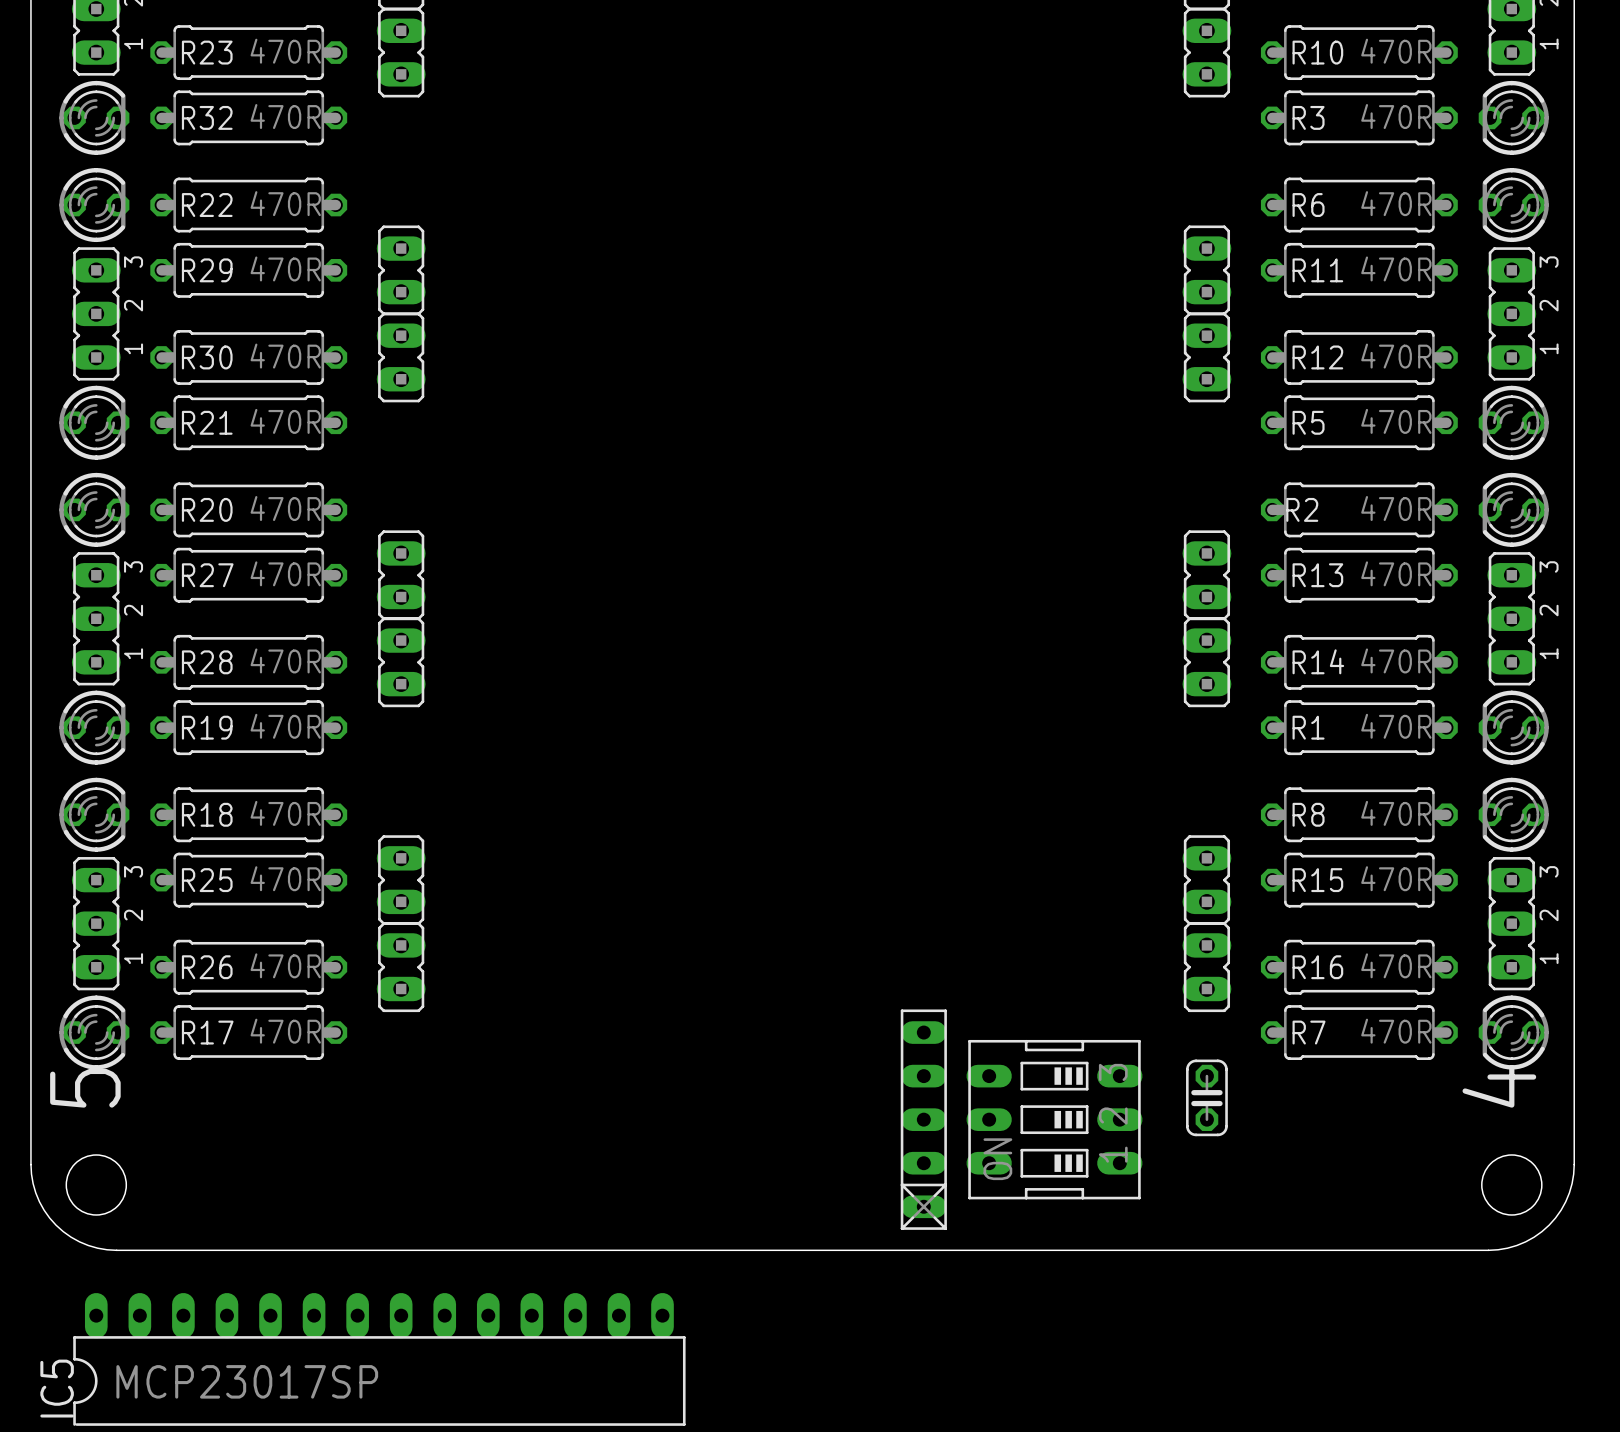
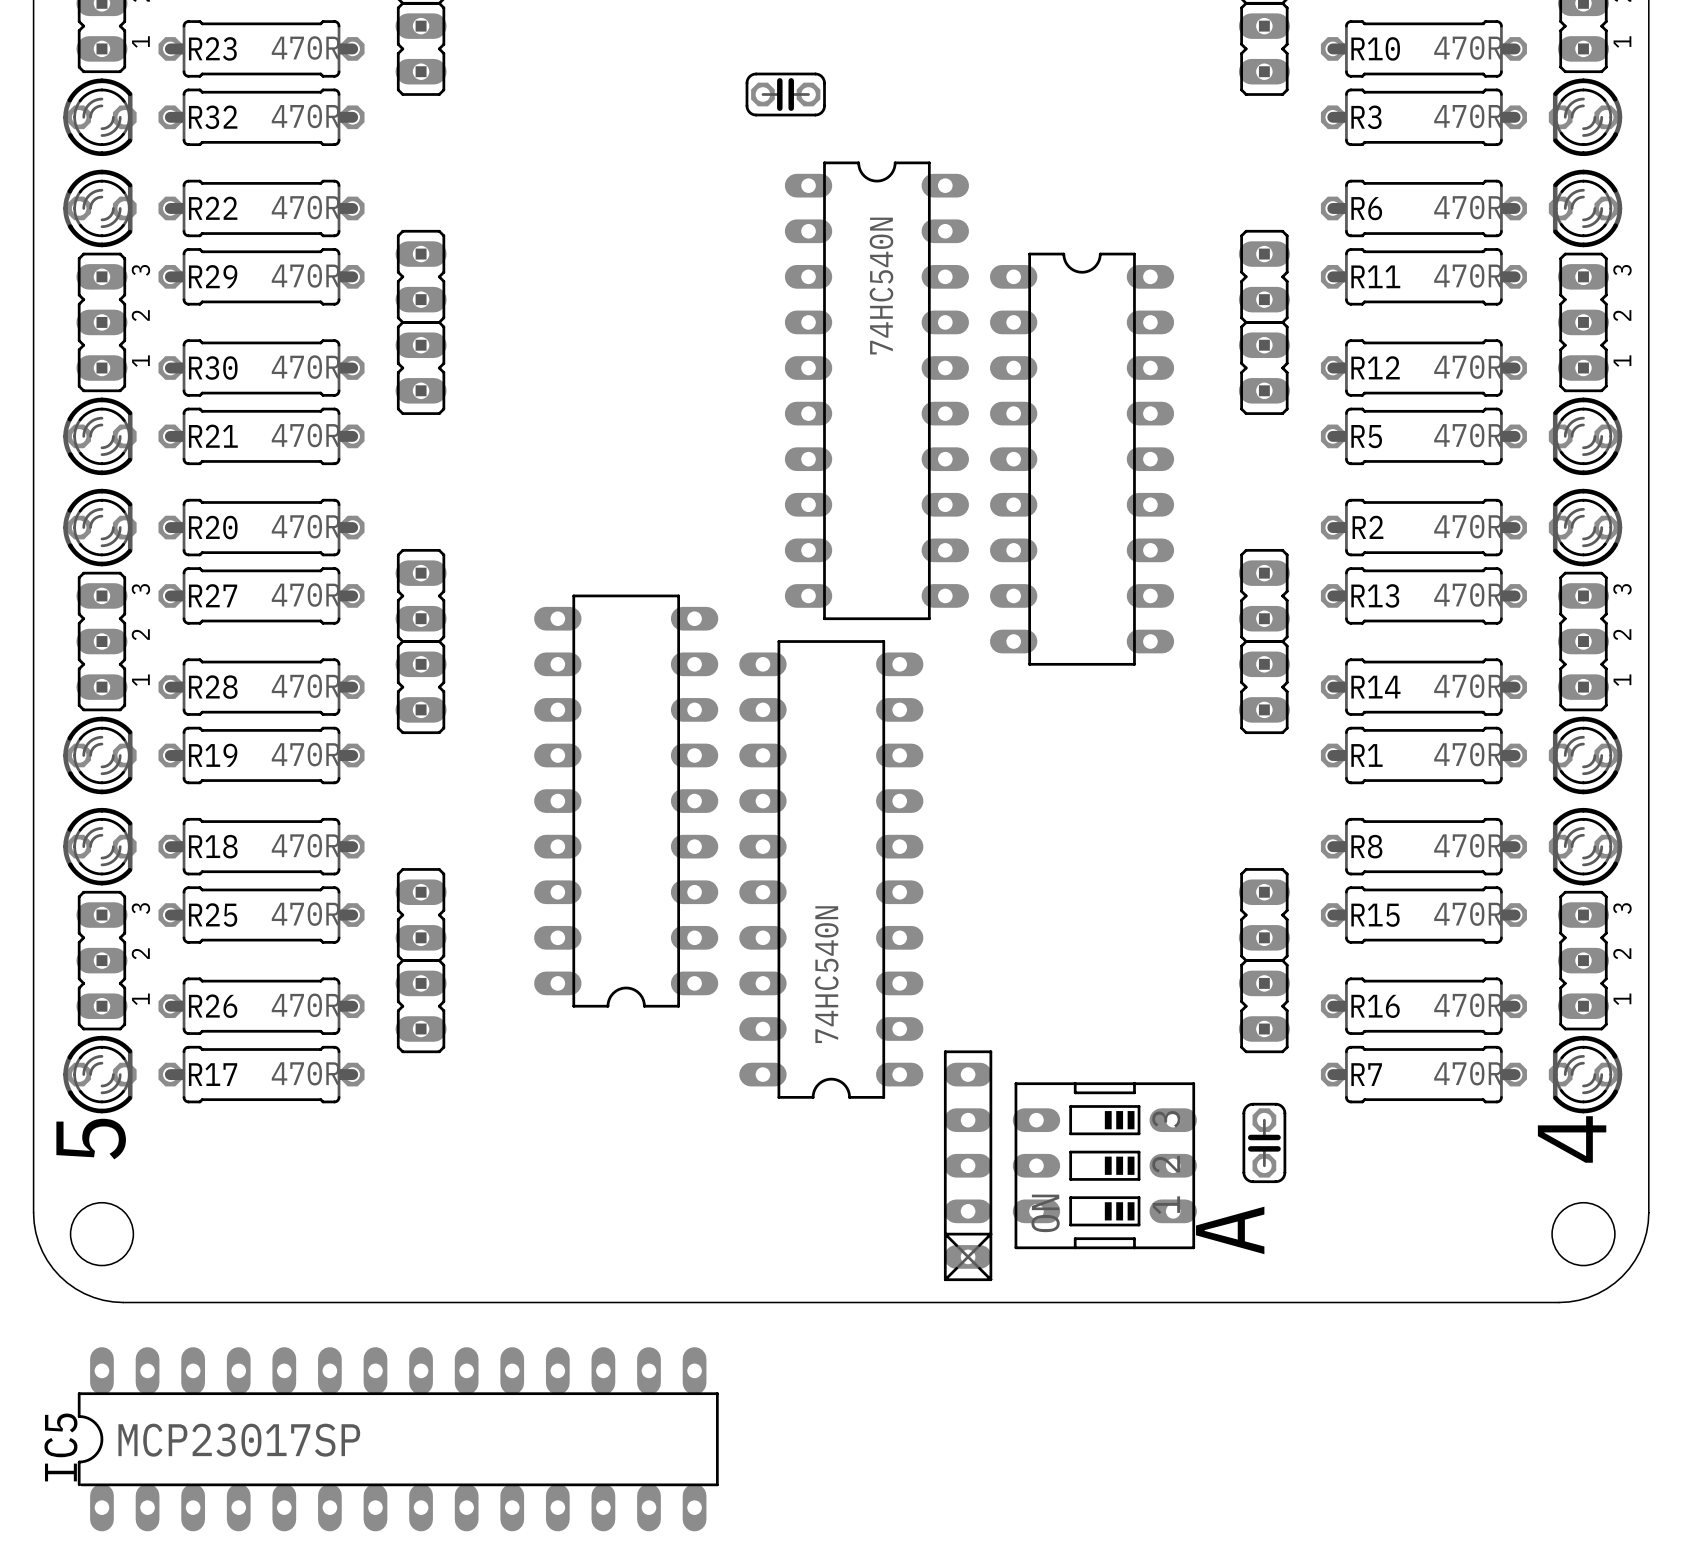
part: none -> (785, 94)
part: none -> 74HC540N (876, 390)
part: none -> (1082, 459)
part: none -> (626, 801)
part: none -> 74HC540N (831, 869)
text: none -> A (1230, 1230)

